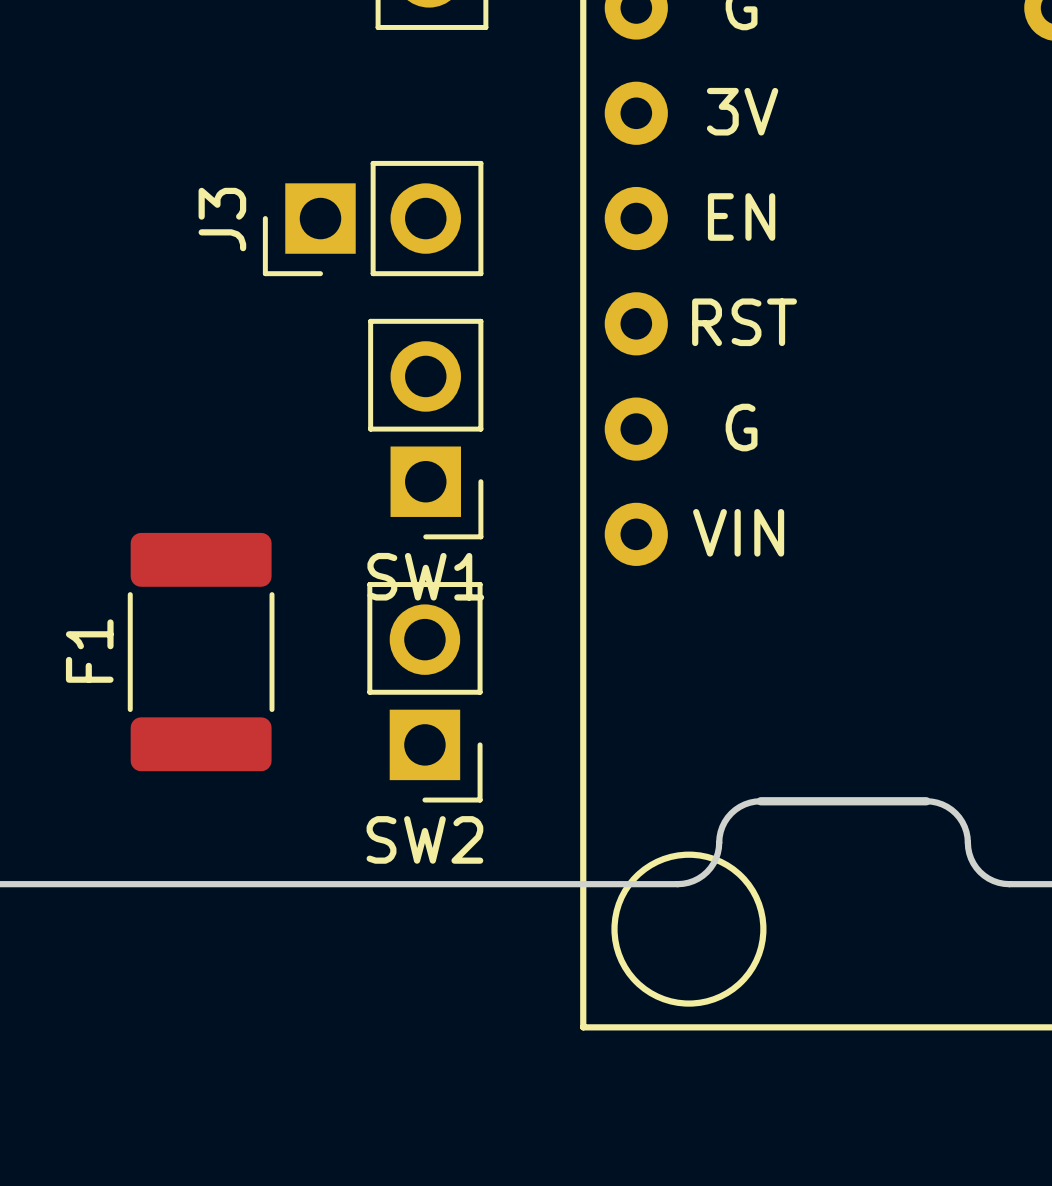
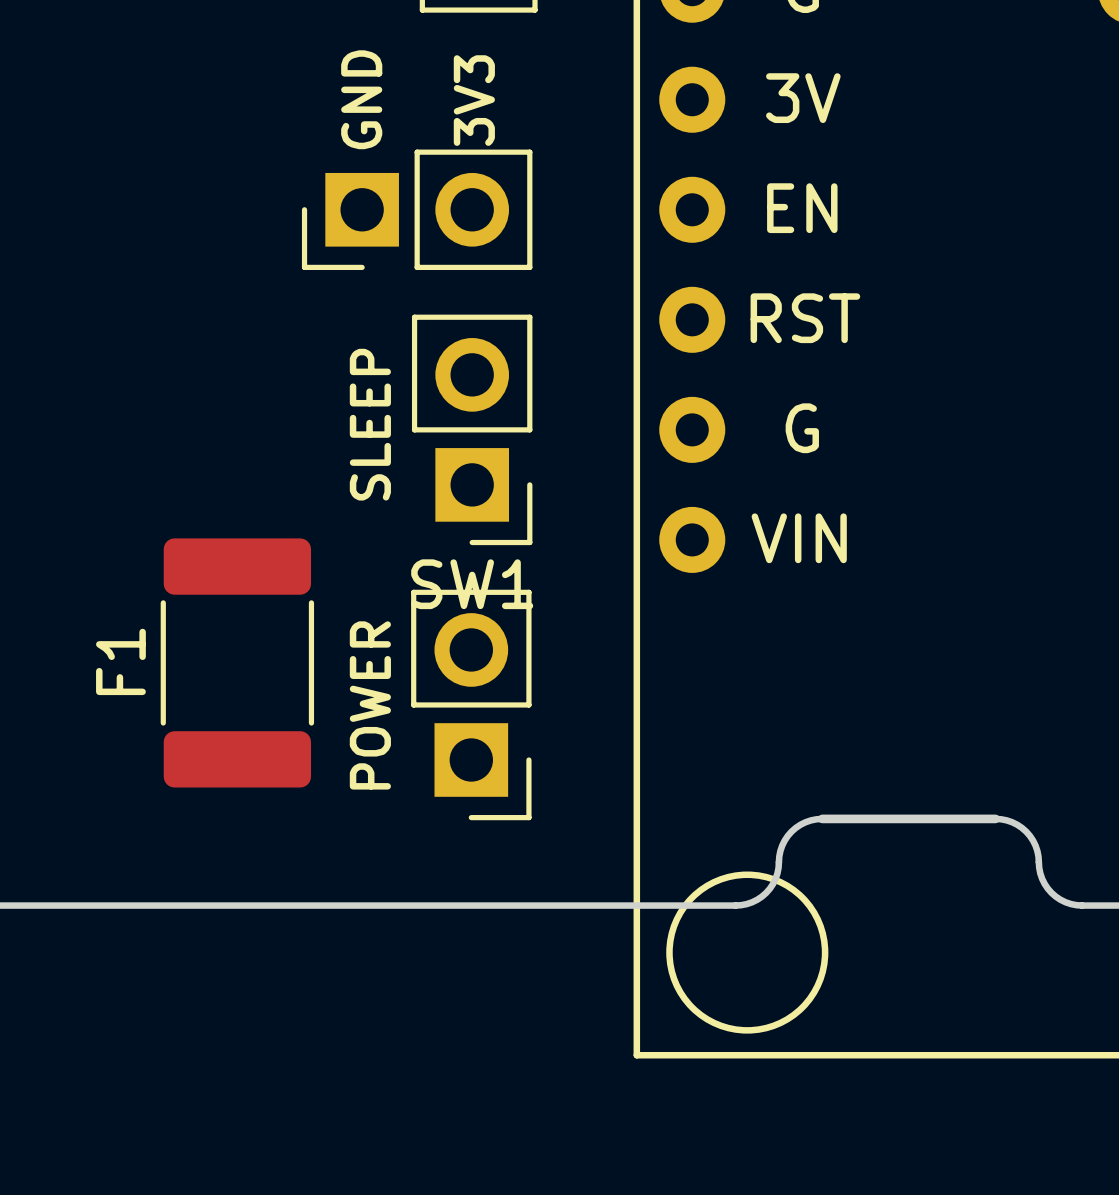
text: none -> GND (361, 99)
text: none -> 3V3 (474, 100)
J3 name: J3 (222, 219) -> none
text: none -> SLEEP (370, 424)
text: none -> POWER (370, 705)
SW2 name: SW2 (424, 839) -> none

